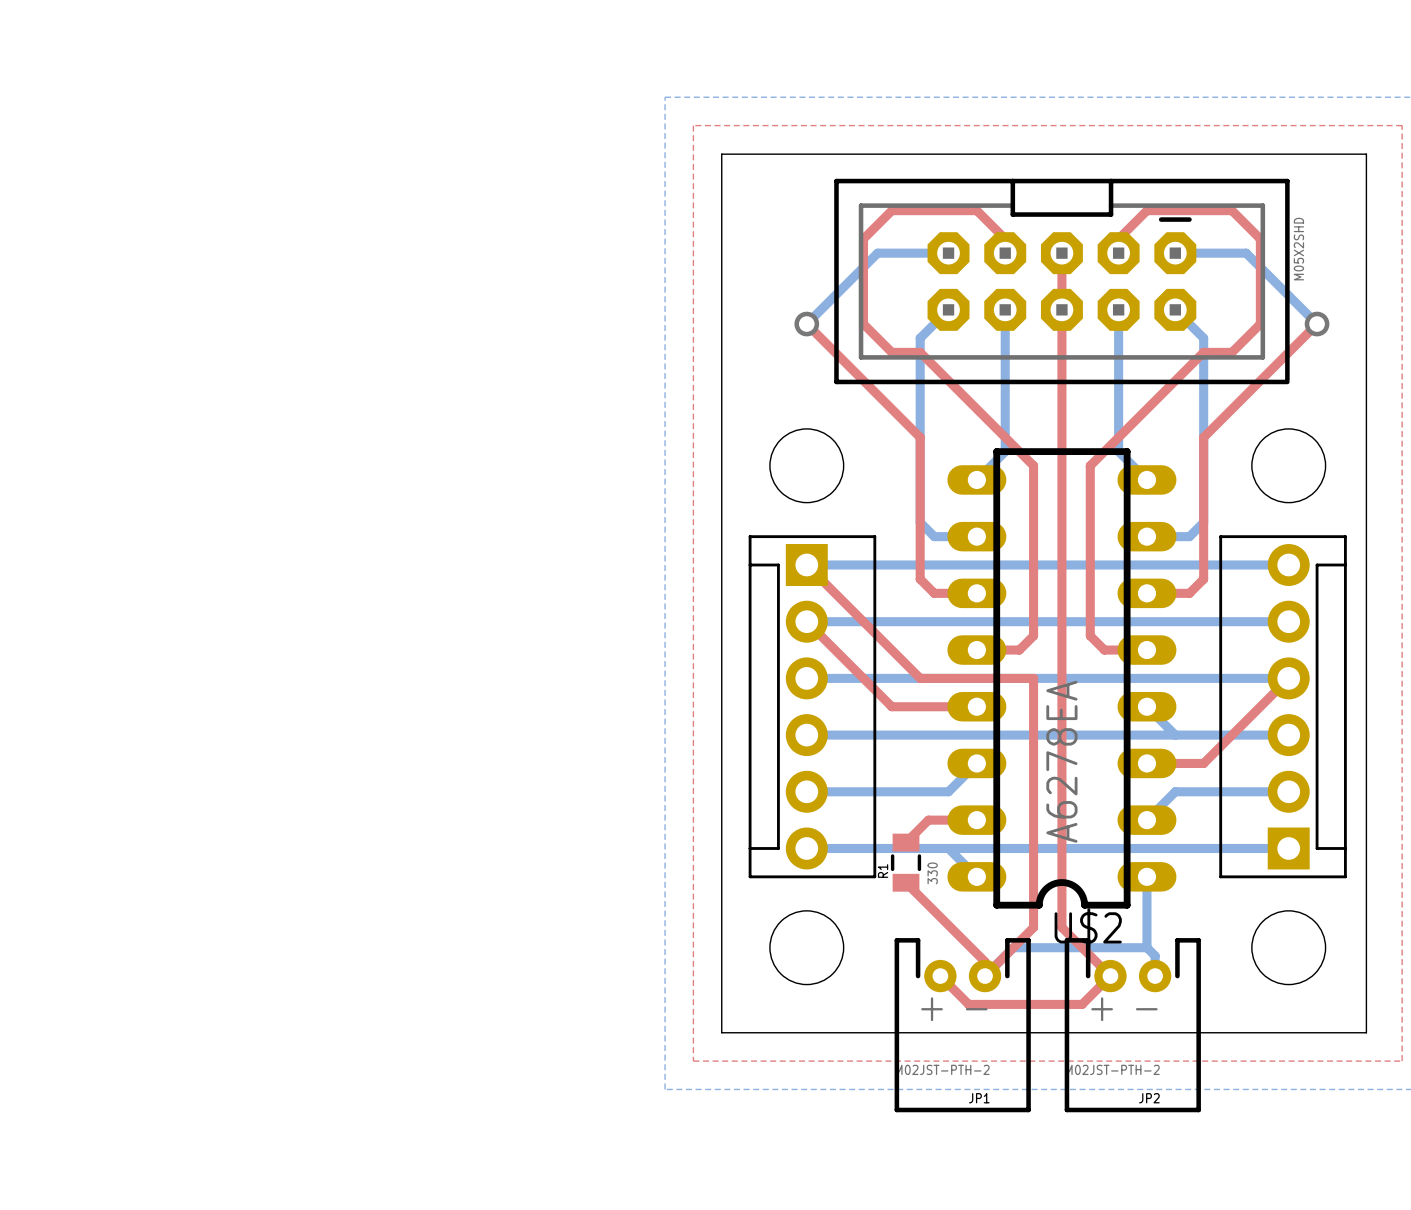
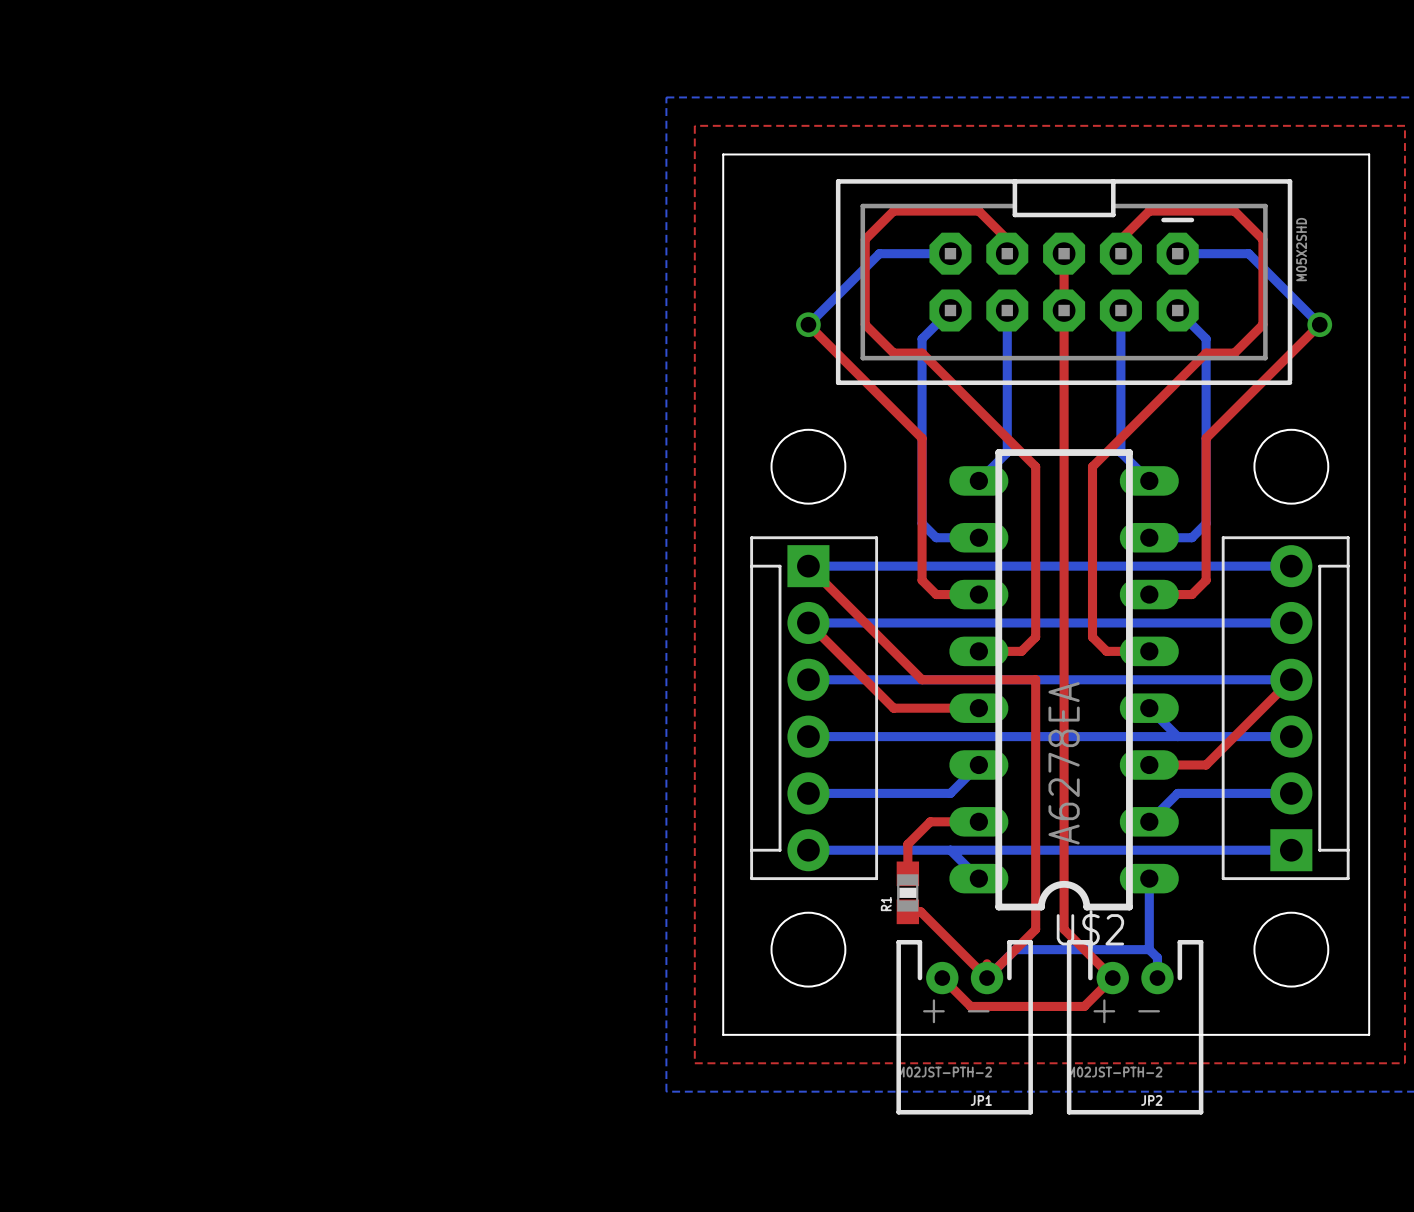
R1 footprint: [890, 833, 922, 892] -> [896, 861, 920, 925]
top track: none -> (907, 844) (907, 873)
R1 value: 330 (932, 873) -> none
top track: (906, 882) (985, 961) -> none
top track: none -> (907, 911) (920, 911) (987, 978)

